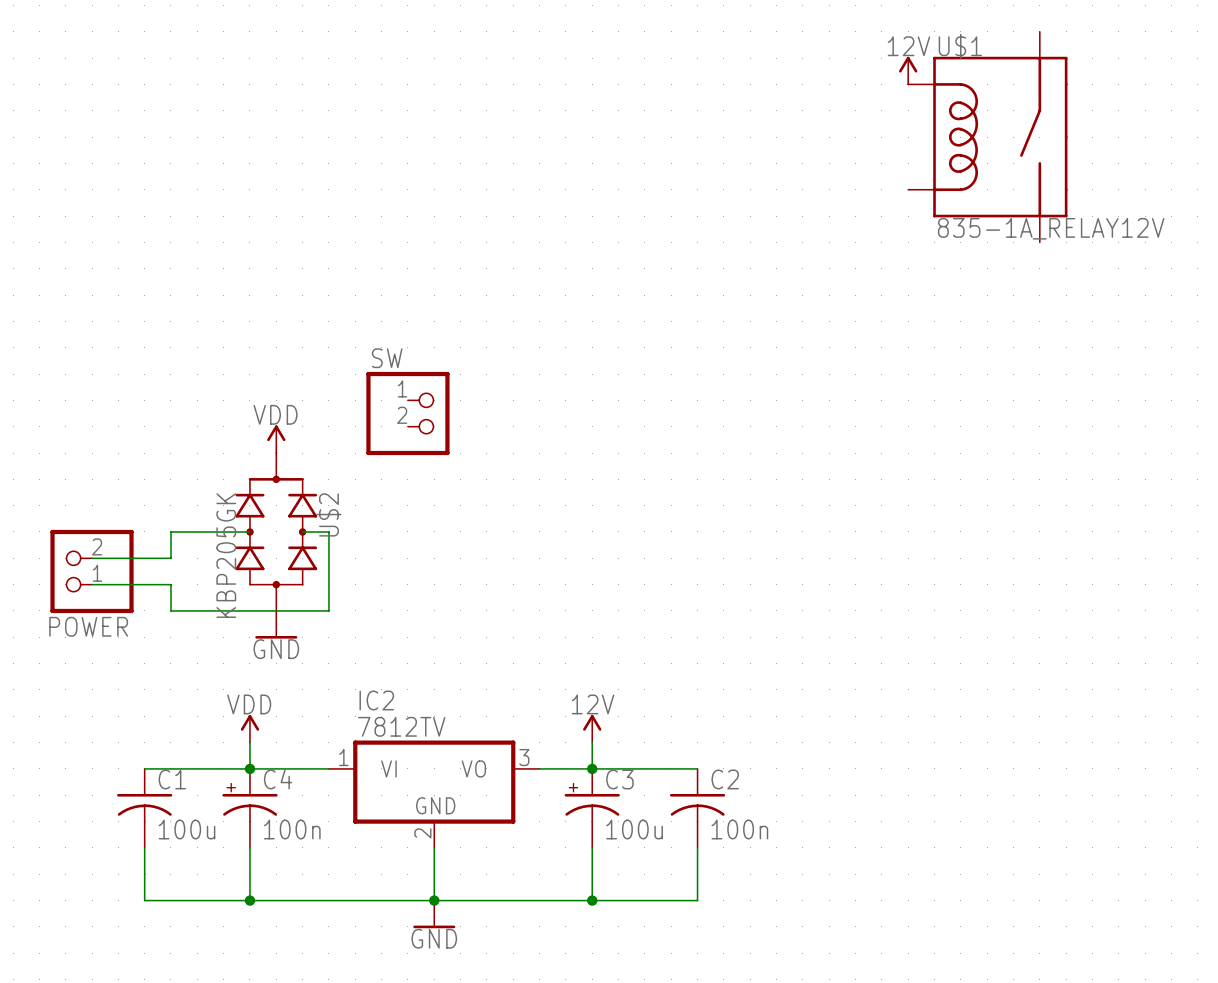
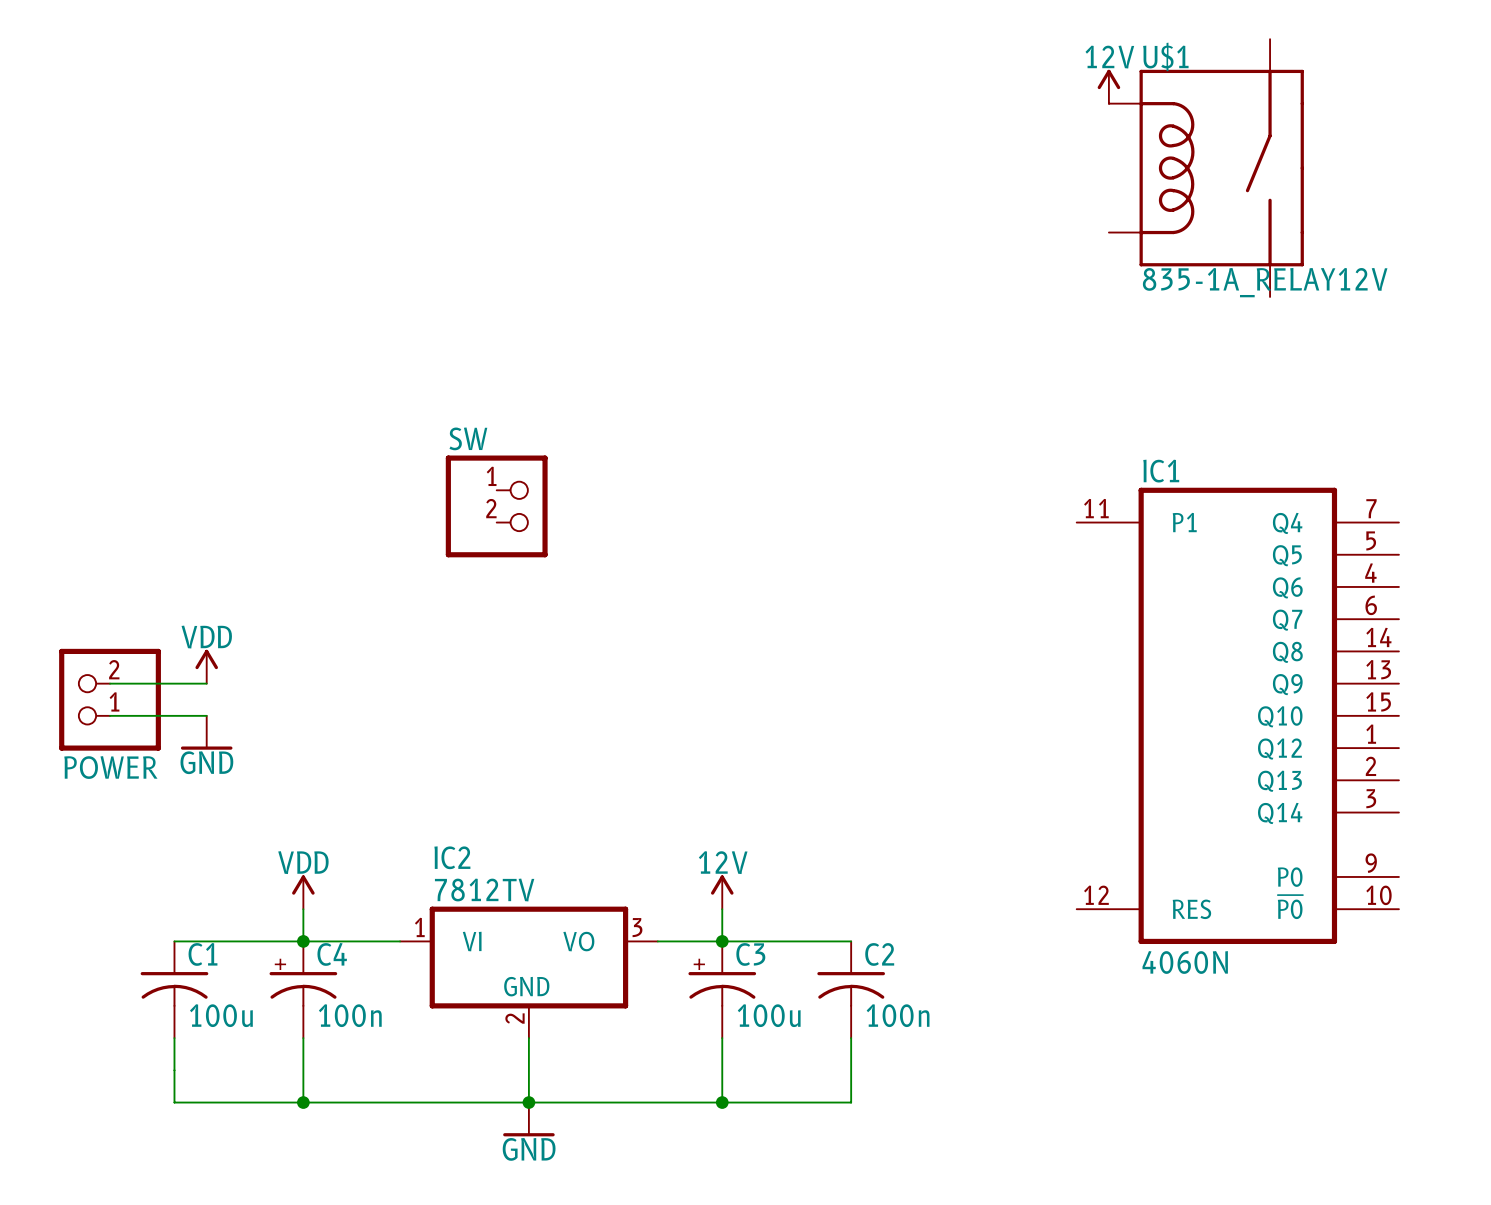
power symbol position: VDD (276, 439) -> VDD (206, 666)
wire: (249, 531) (170, 531) (170, 558) -> none
U$2: KBP205GK (276, 531) -> none
wire: (302, 531) (328, 531) (328, 610) (170, 610) (170, 584) -> none
IC1: none -> 4060N (1237, 715)
power symbol position: GND (276, 624) -> GND (206, 732)

